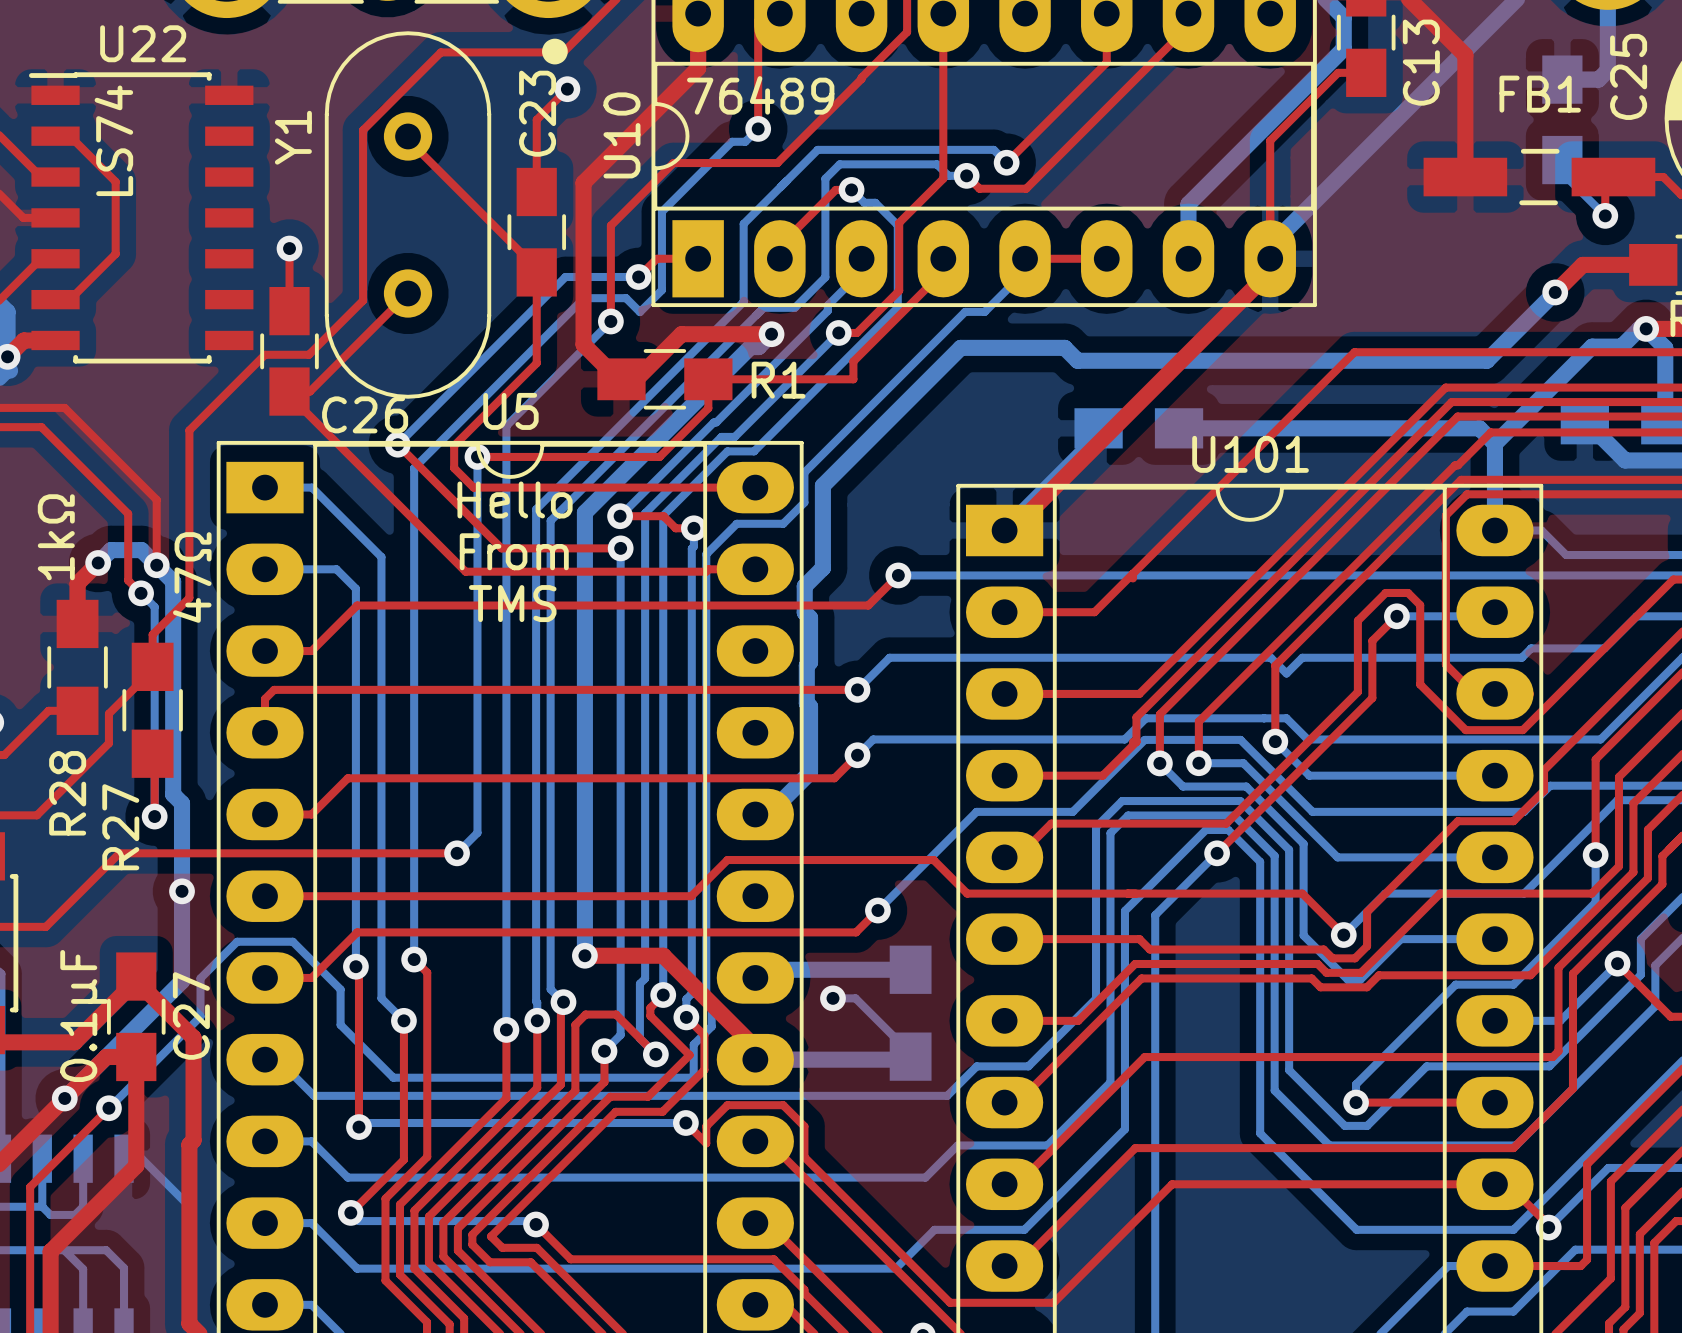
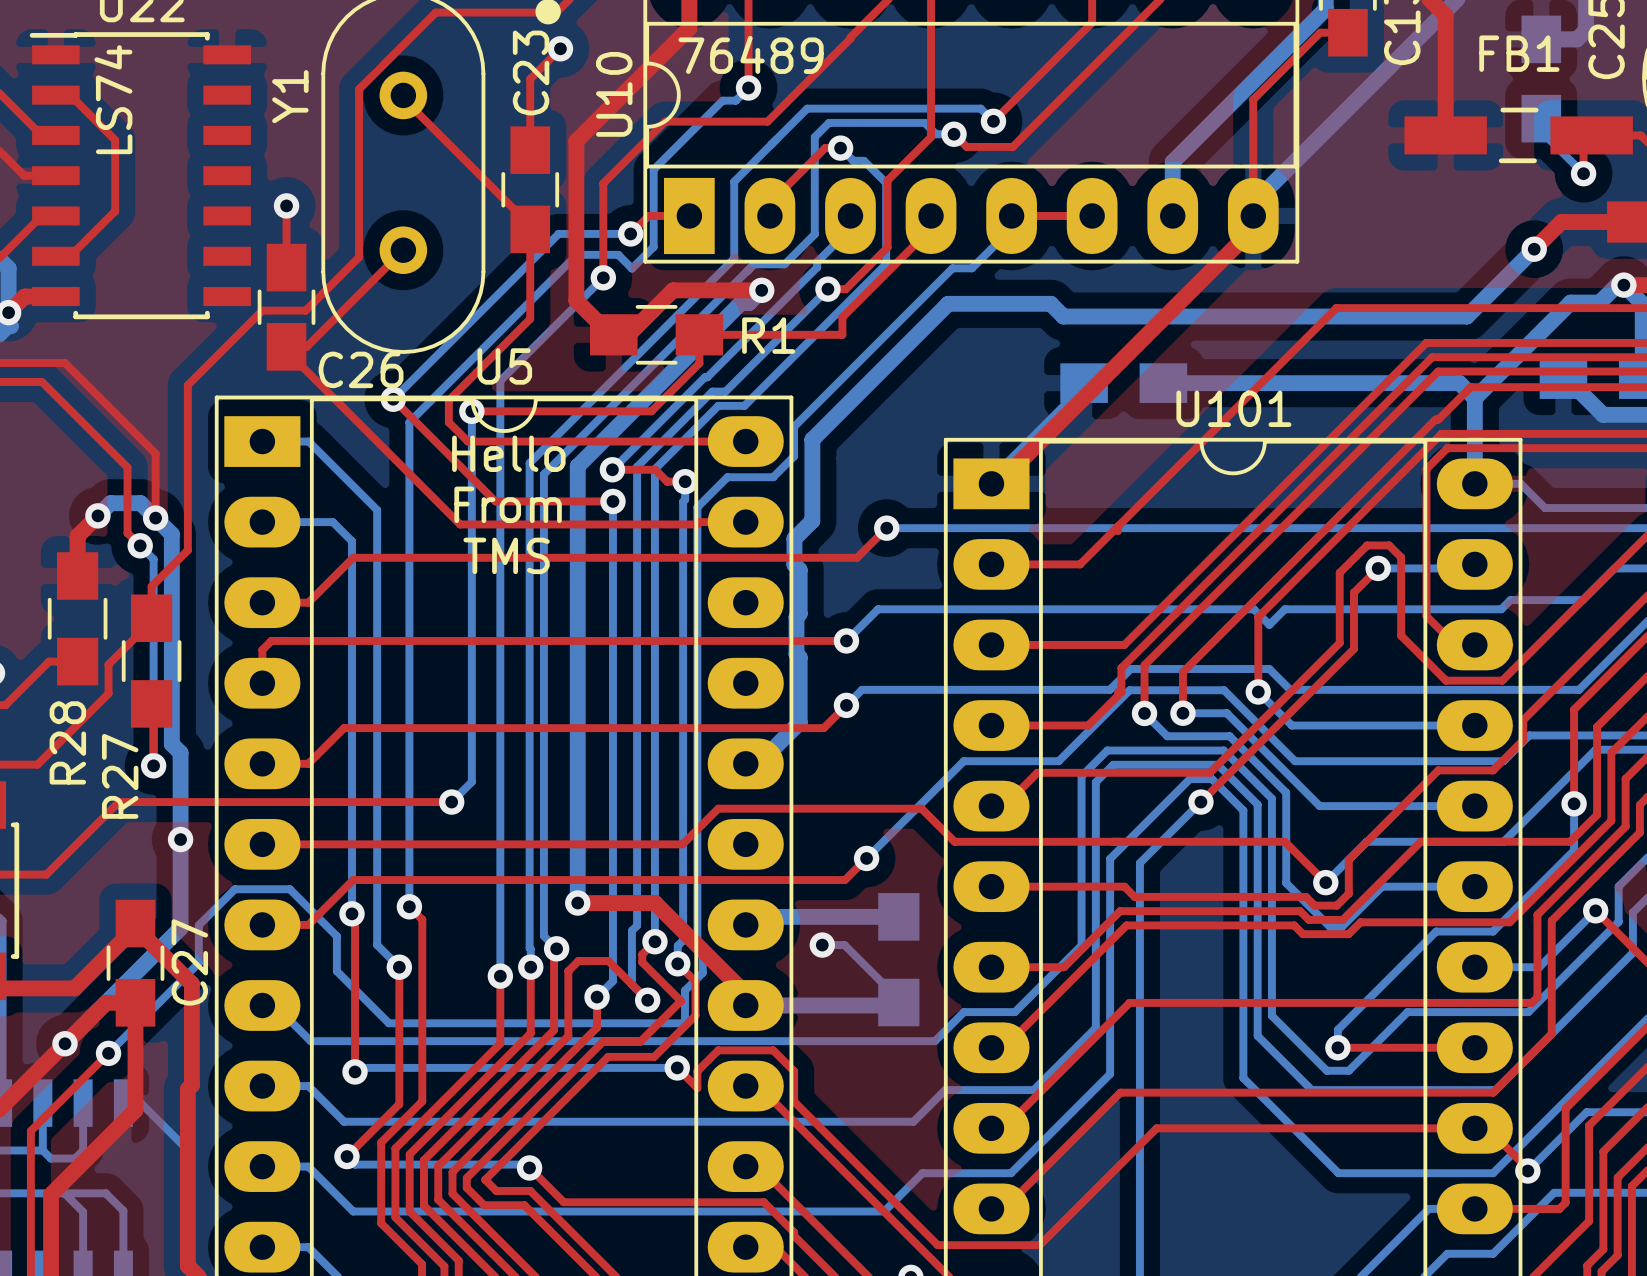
R28 value: 1kΩ (56, 537) -> none
R27 value: 47Ω (192, 577) -> none
C27 value: 0.1µF (84, 1015) -> none

